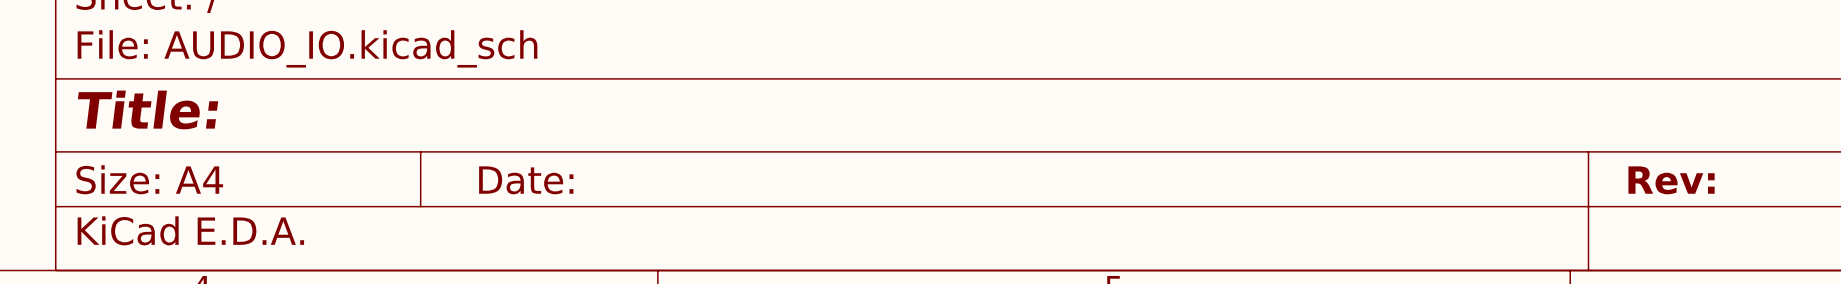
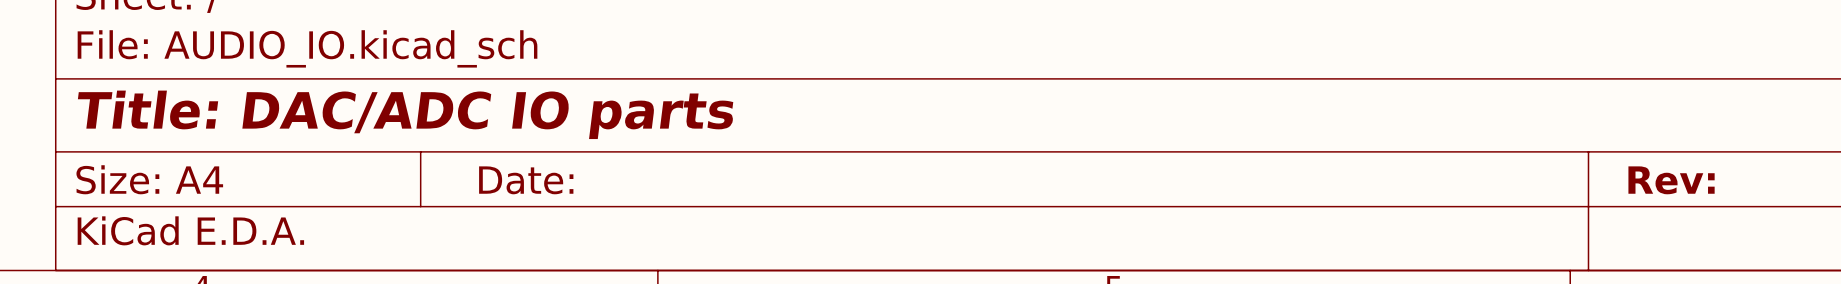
title block: Title: (148, 109) -> Title: DAC/ADC IO parts (405, 114)

